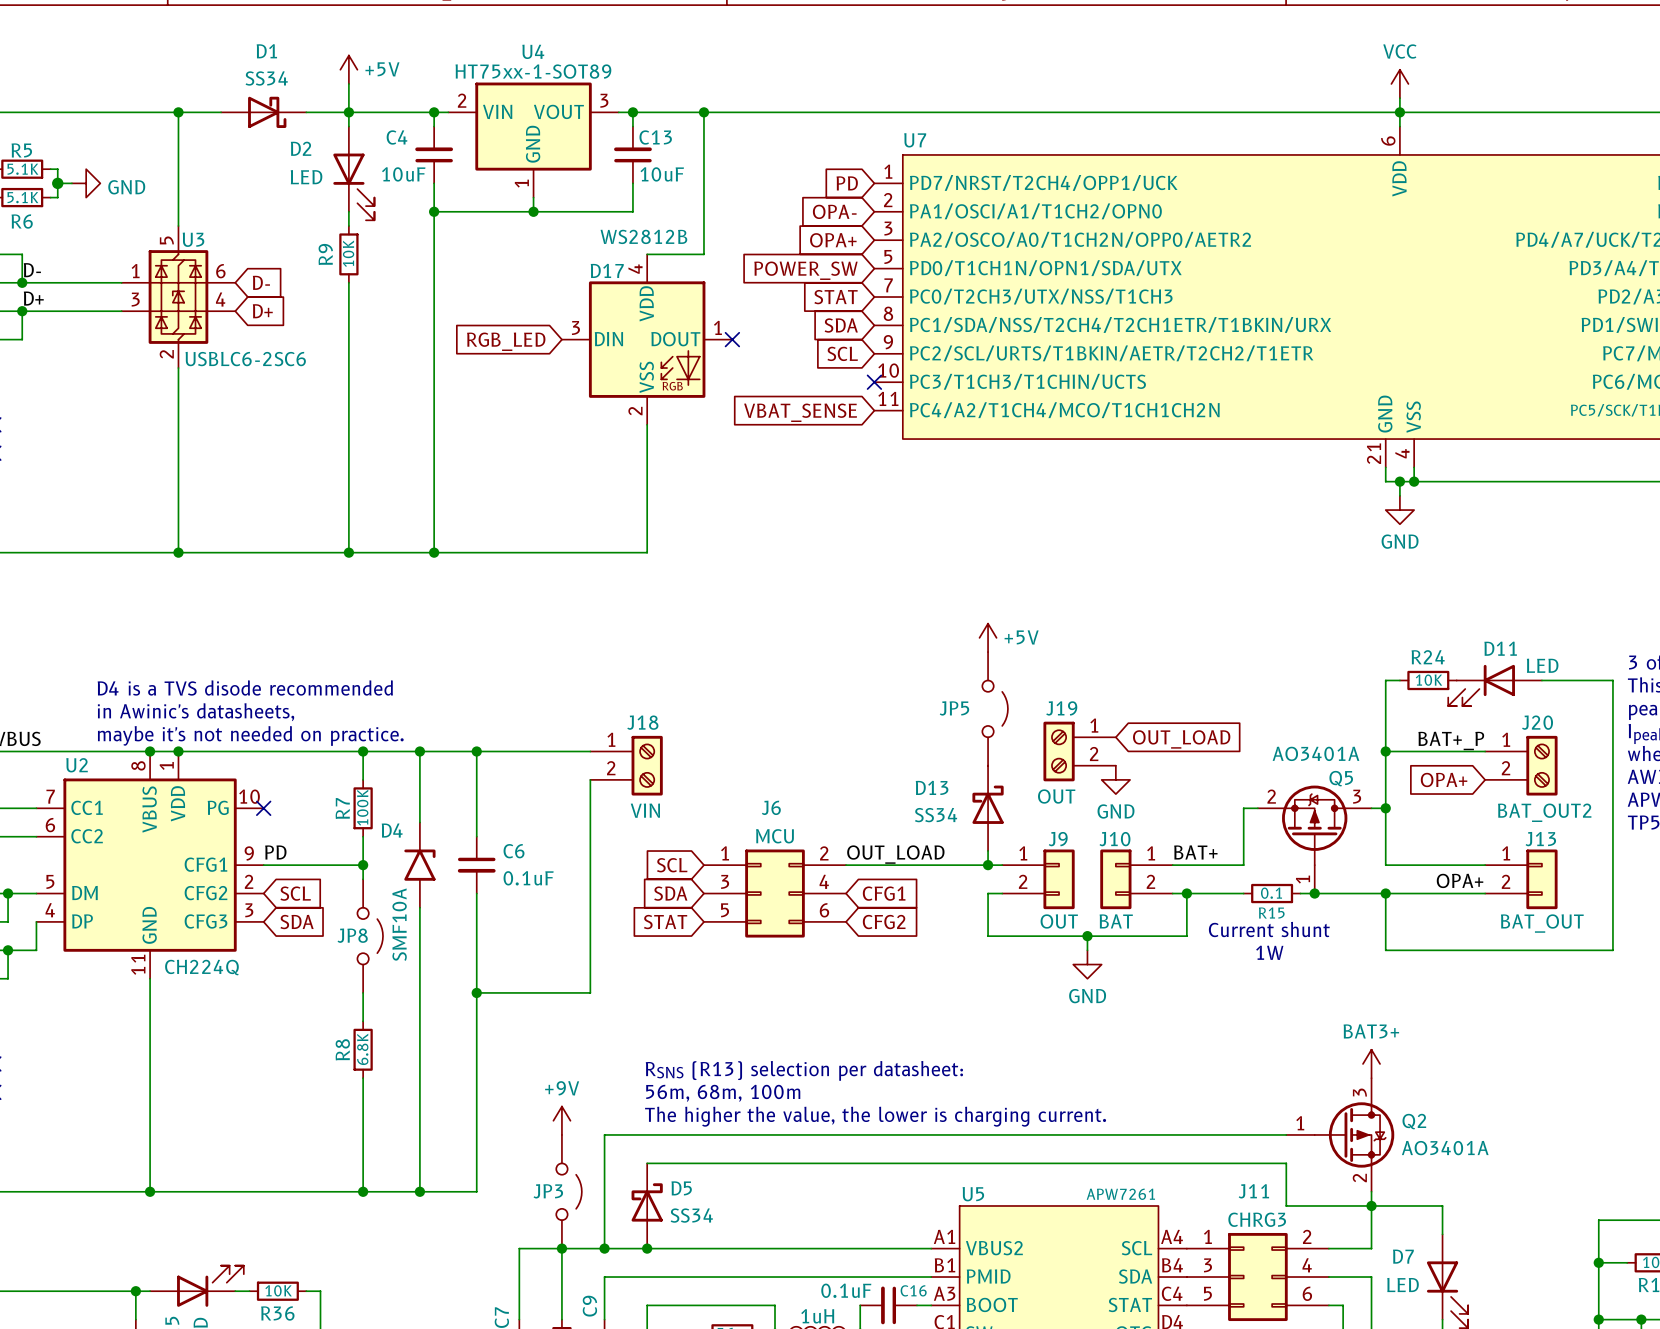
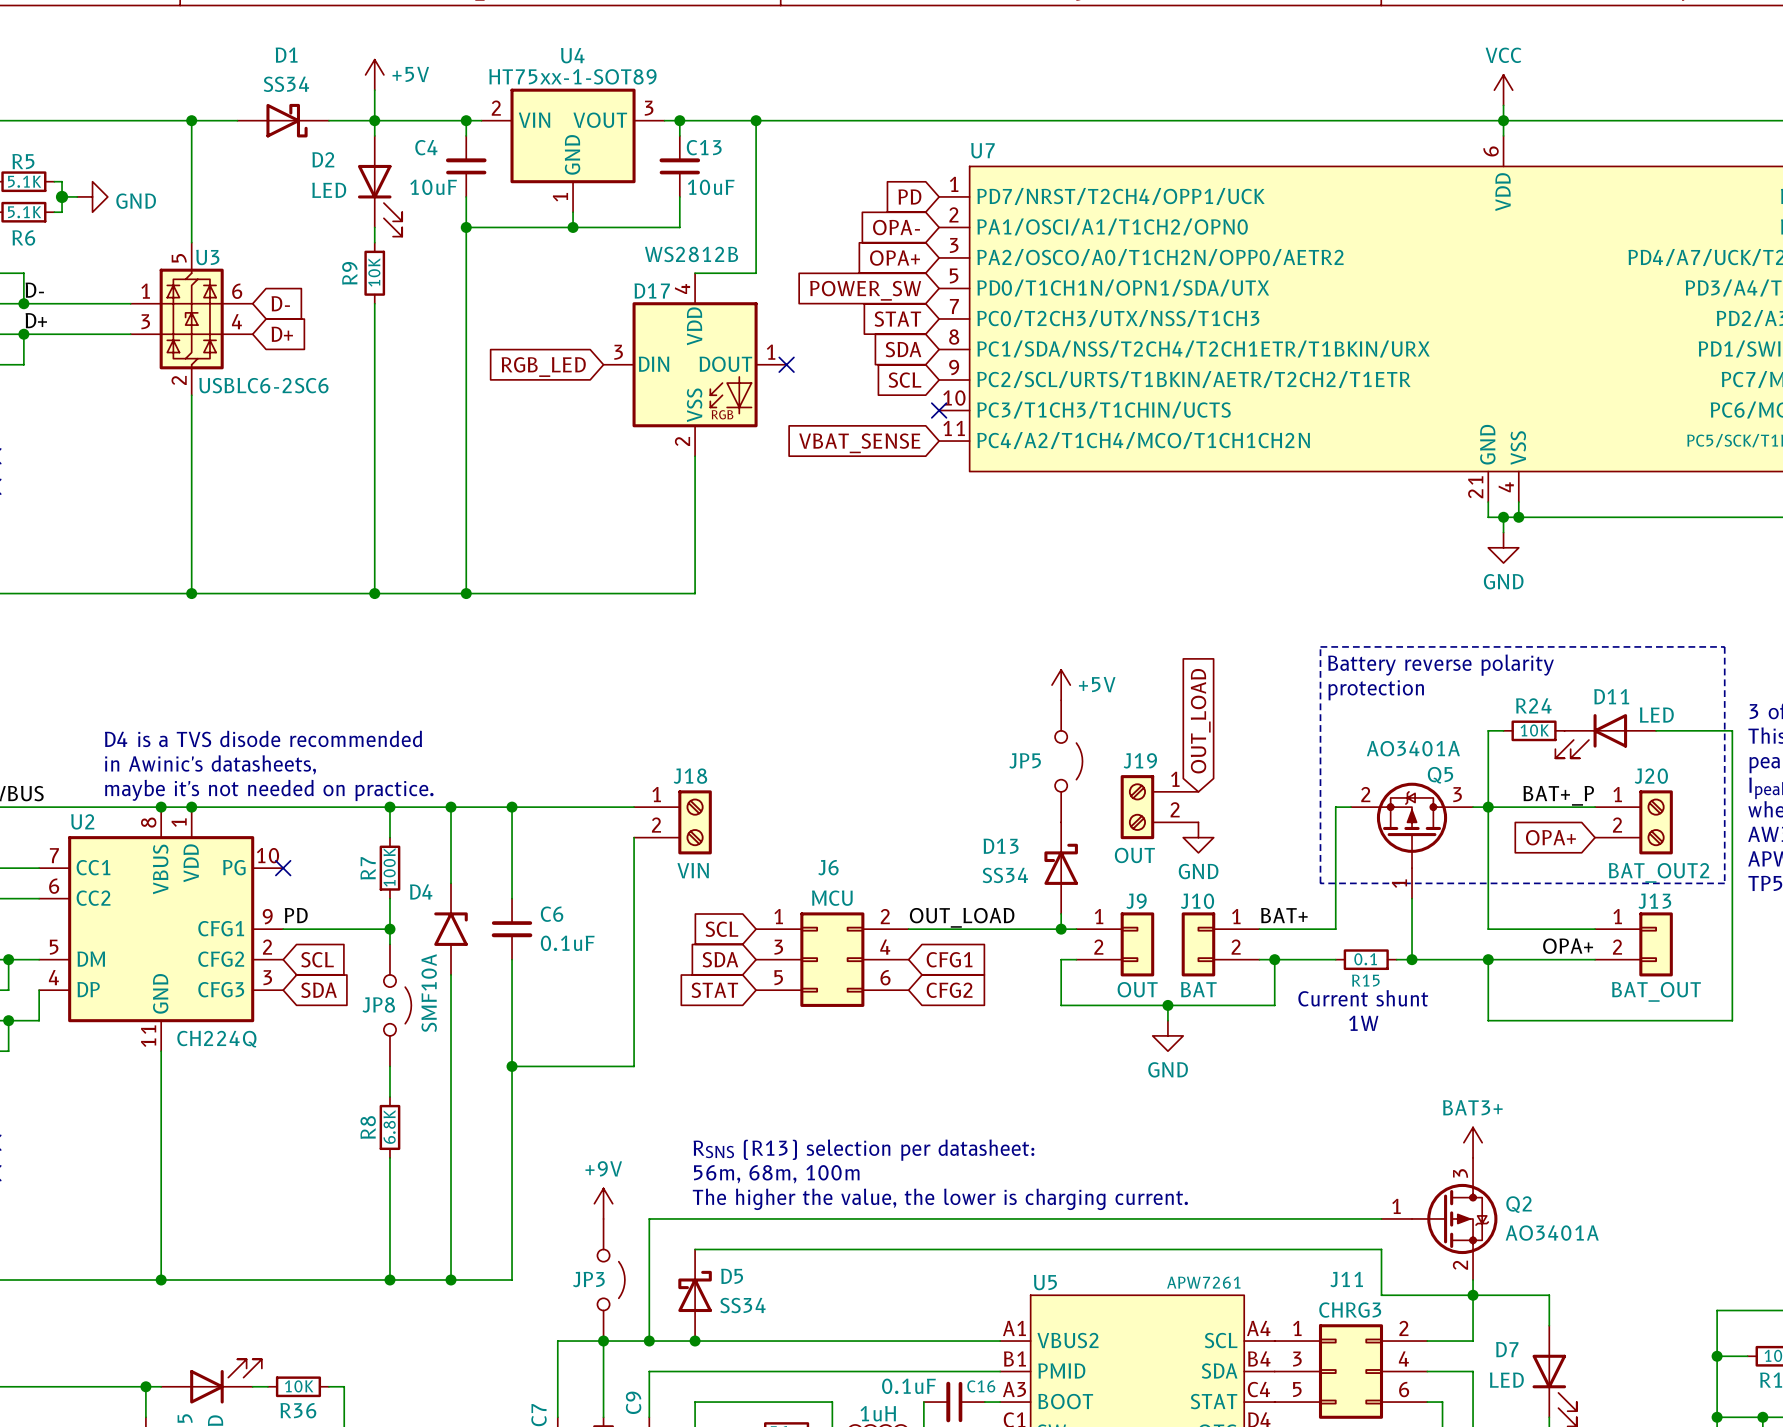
line: none -> (1320, 646) (1724, 646) (1724, 883) (1320, 883) (1320, 646)
text: none -> Battery reverse polarity (1441, 665)
text: none -> protection (1376, 690)
global label rotation: 0° (1181, 739) -> 90° counterclockwise (1200, 721)
wire: (1243, 808) (1257, 808) -> (1335, 868) (1335, 807) (1350, 807)
wire: (1371, 808) (1385, 808) -> (1473, 807) (1488, 807)
junction: (1385, 808) -> none
Q5 position: (1314, 839) -> (1412, 840)

